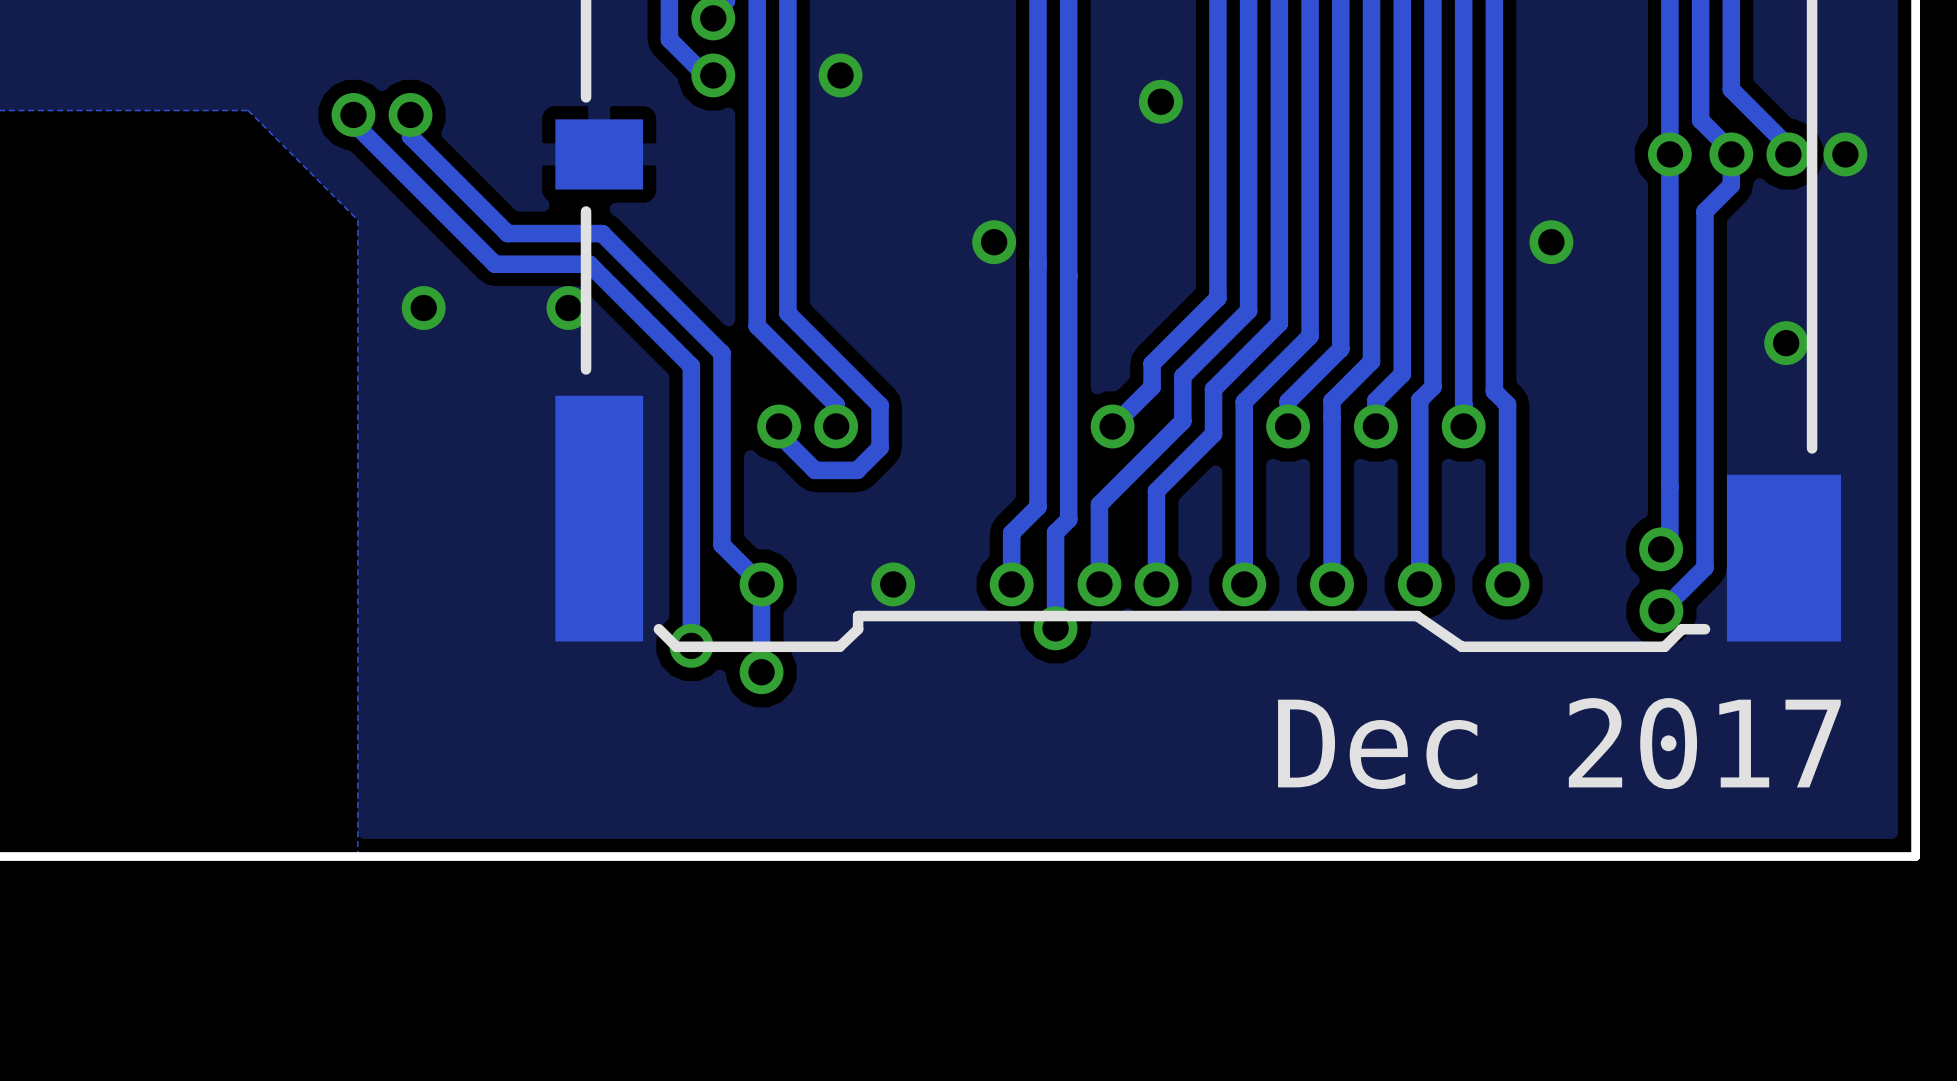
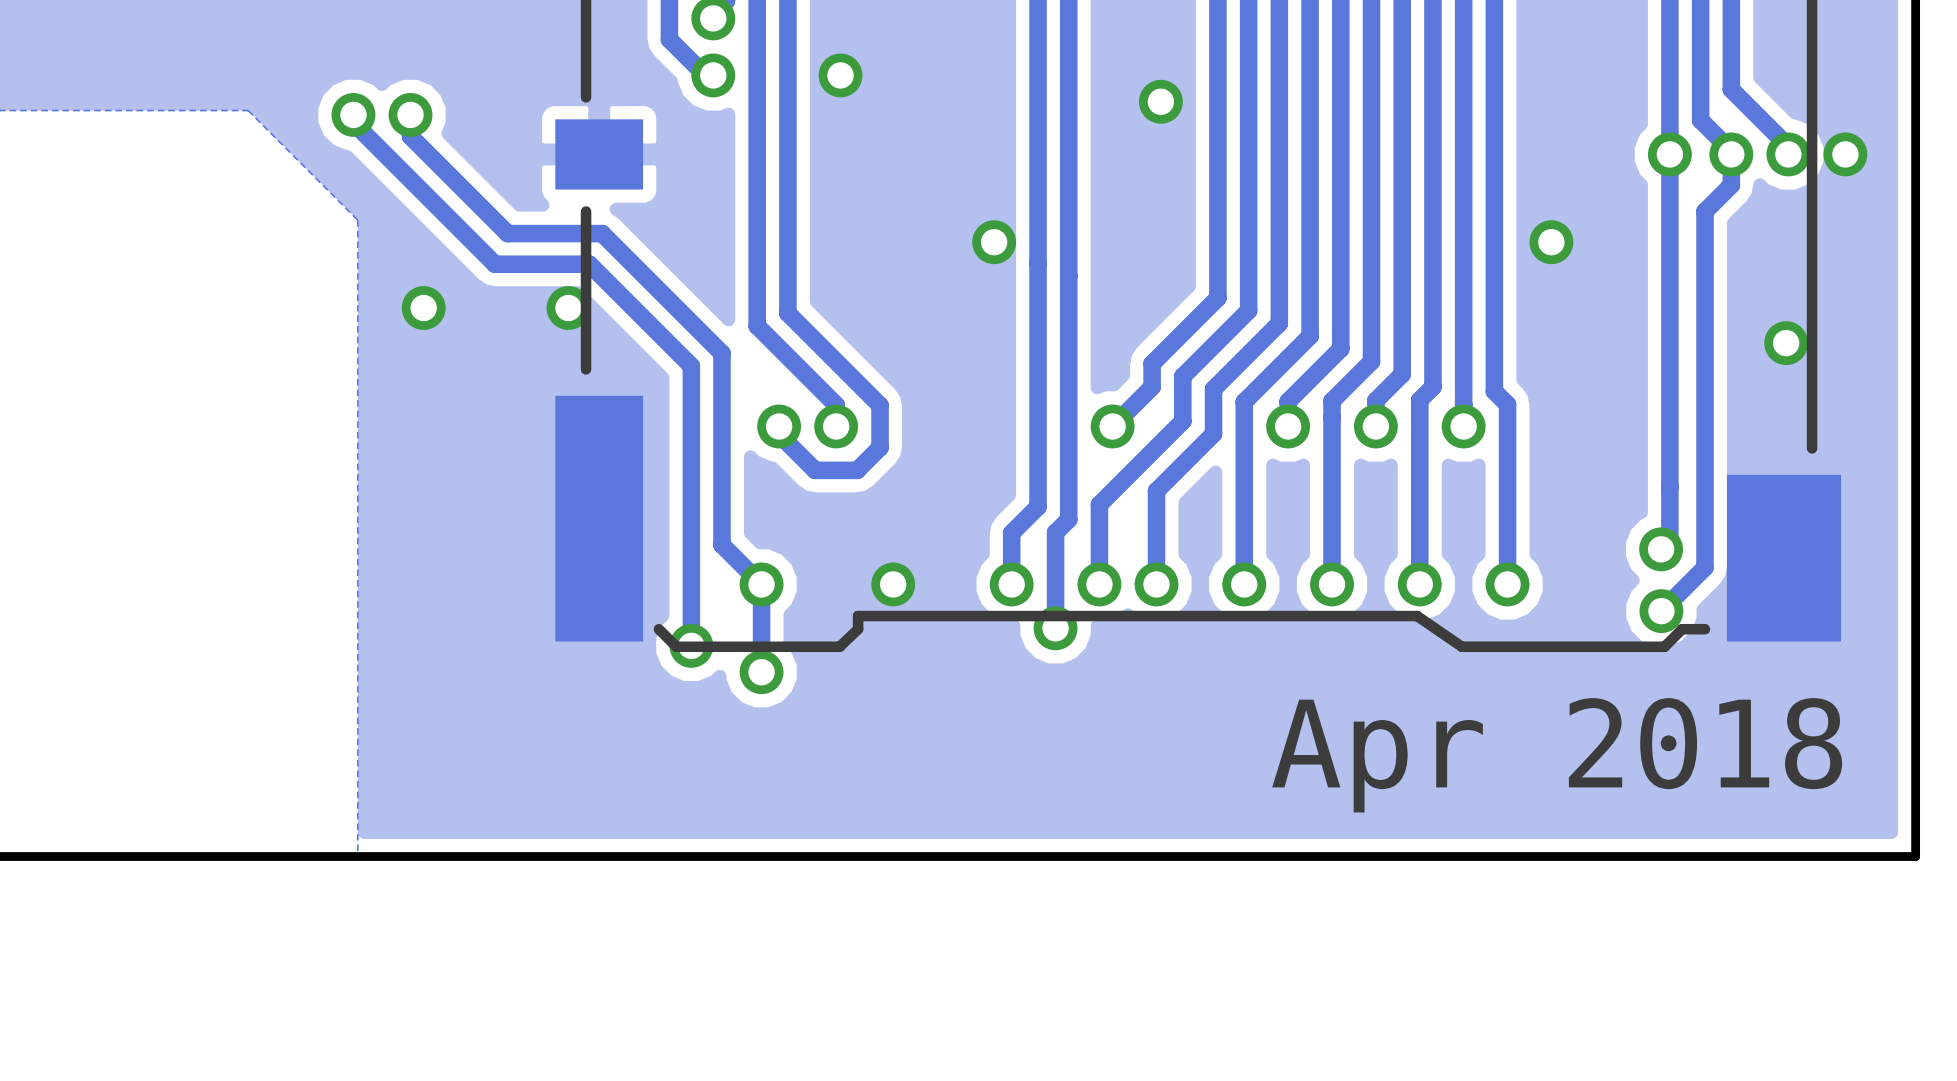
text: Dec 2017 (1559, 743) -> Apr 2018 (1557, 755)

